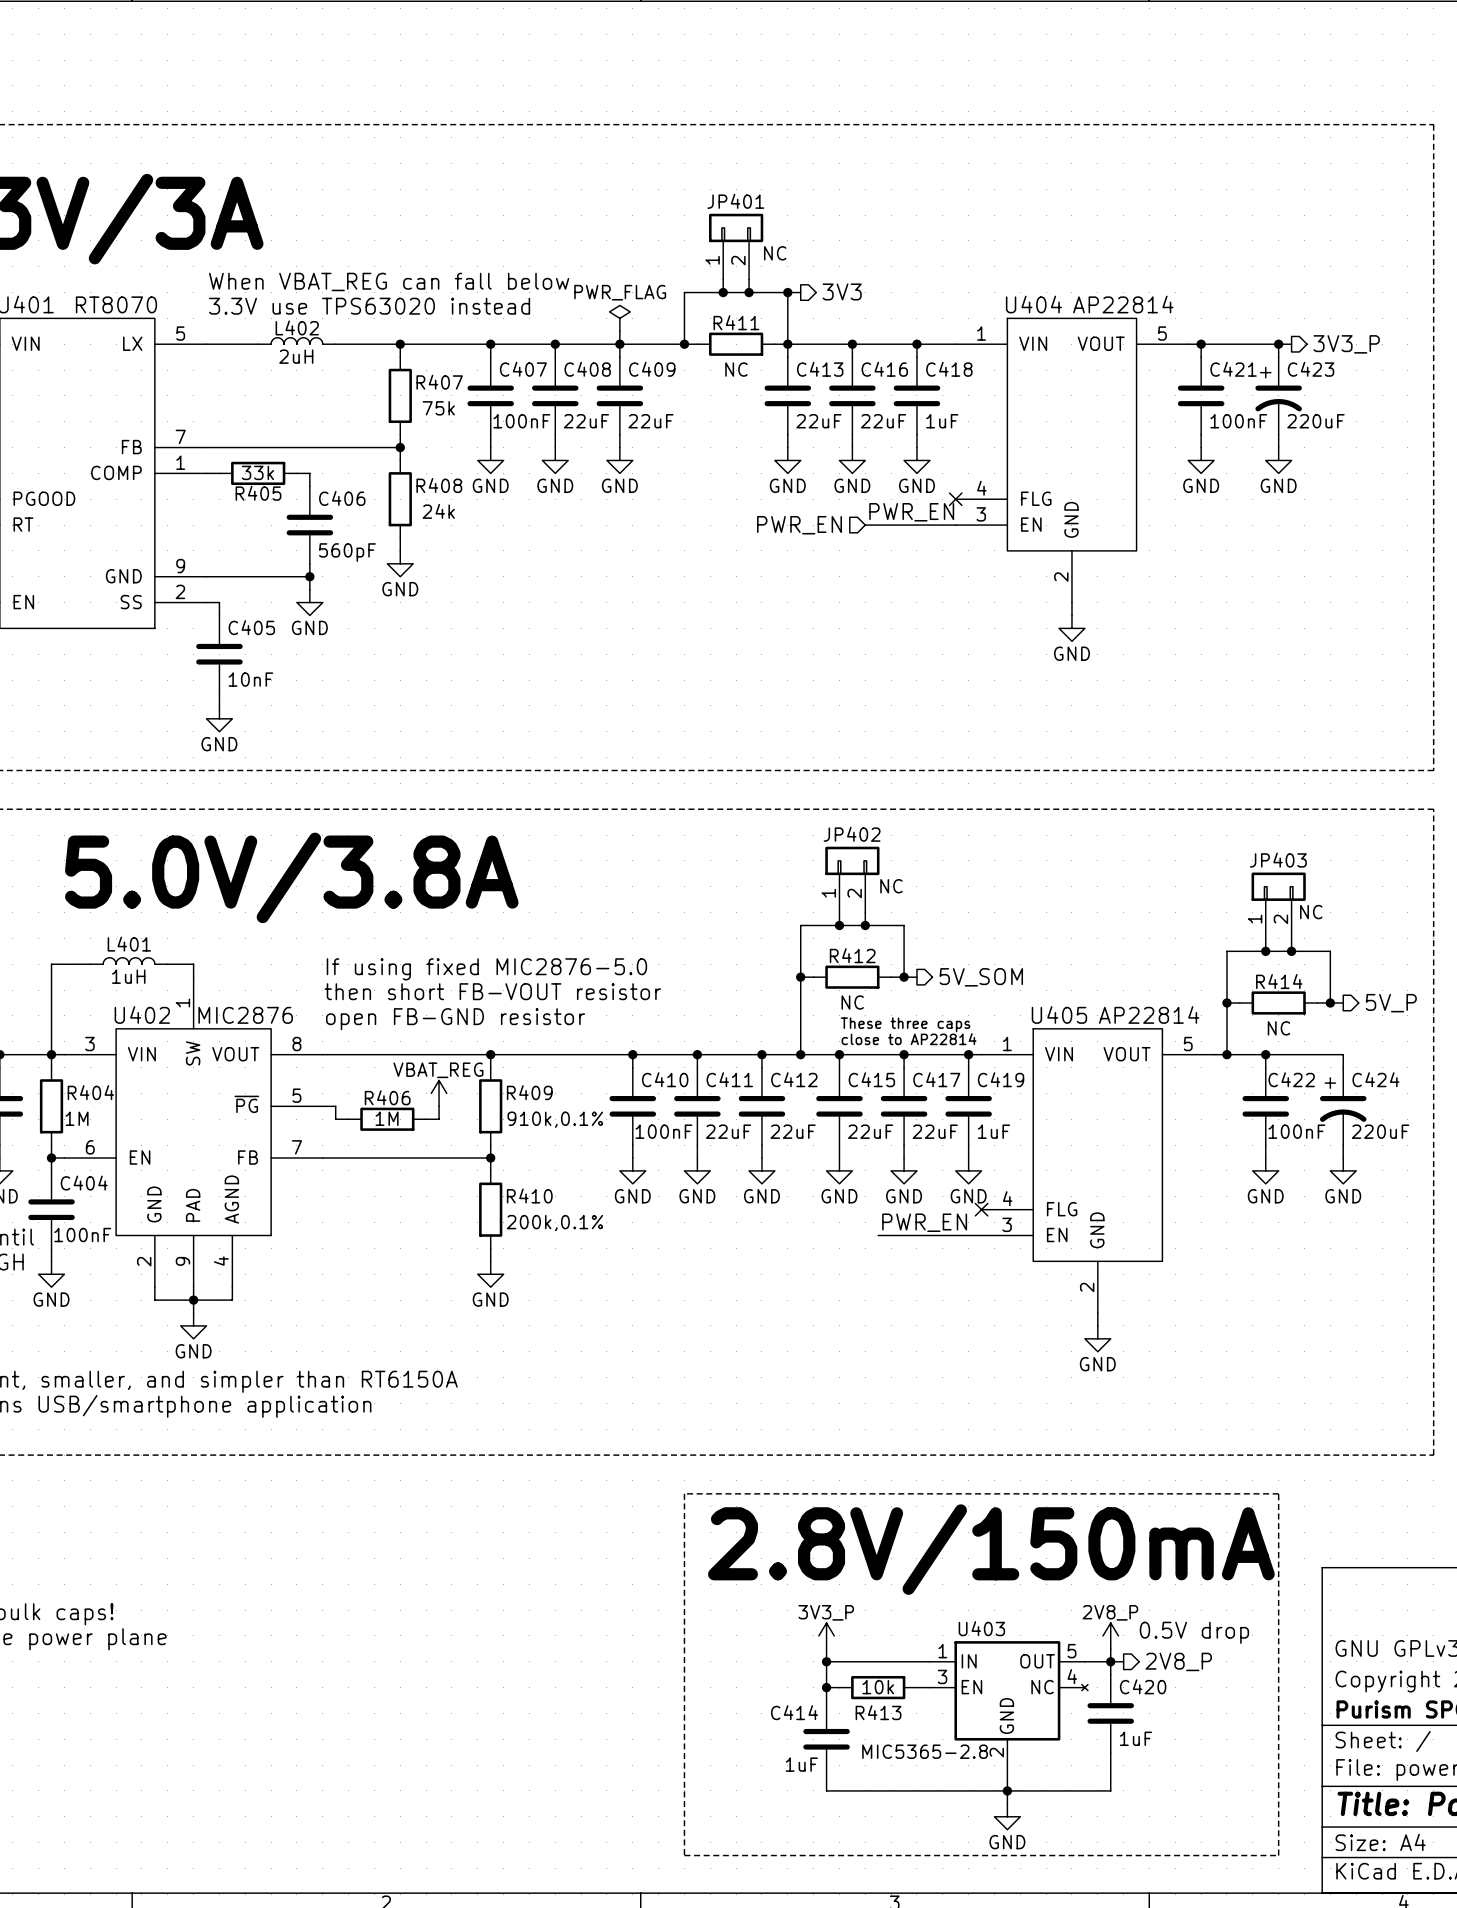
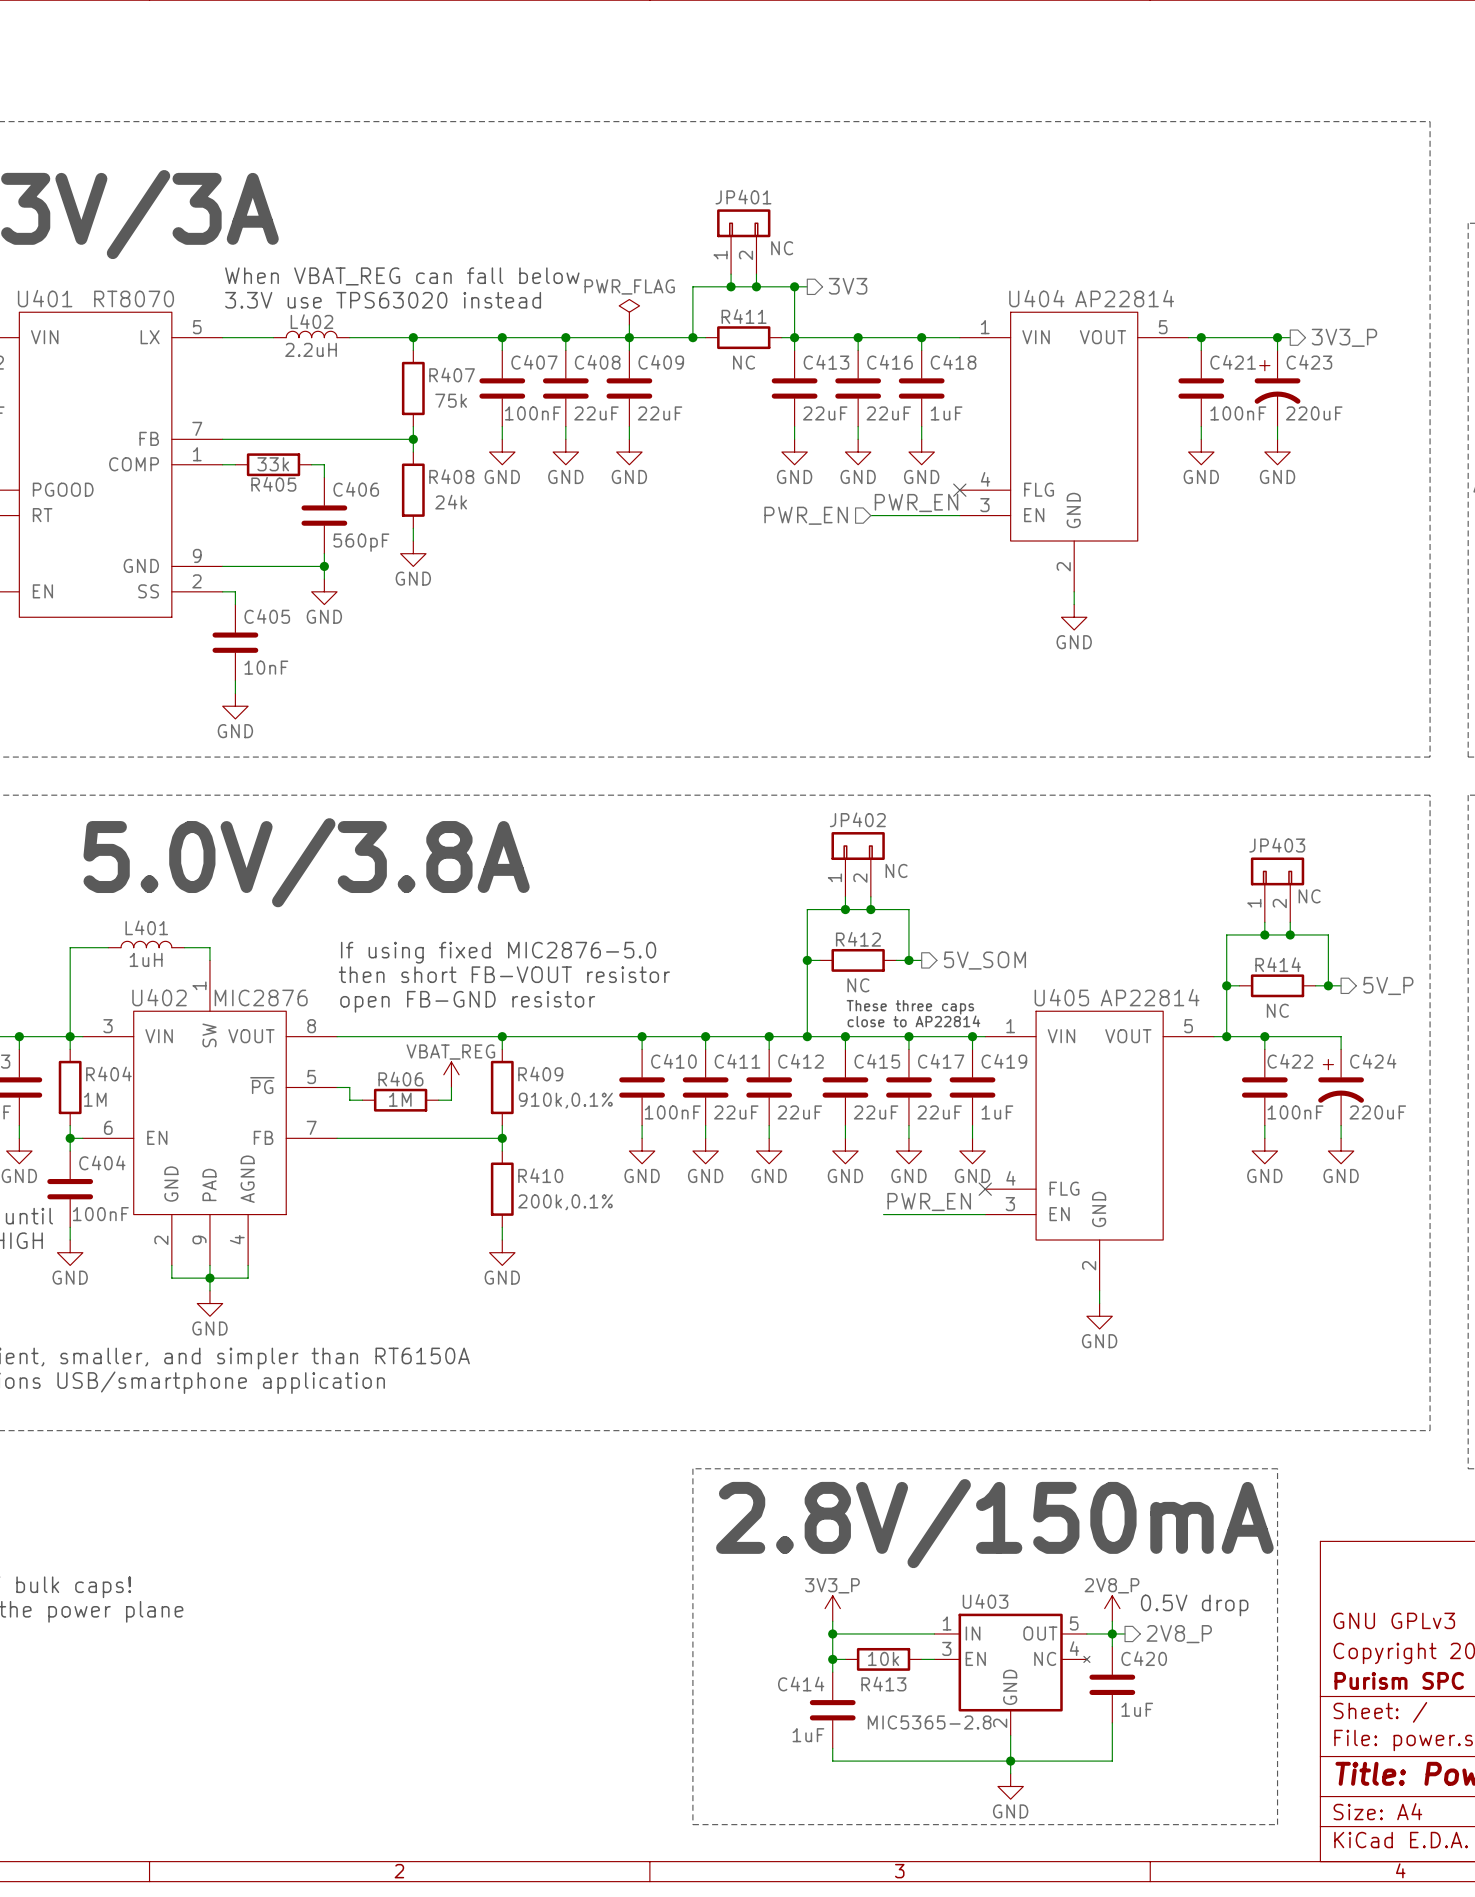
L402 value: 2uH (296, 356) -> 2.2uH (311, 349)

